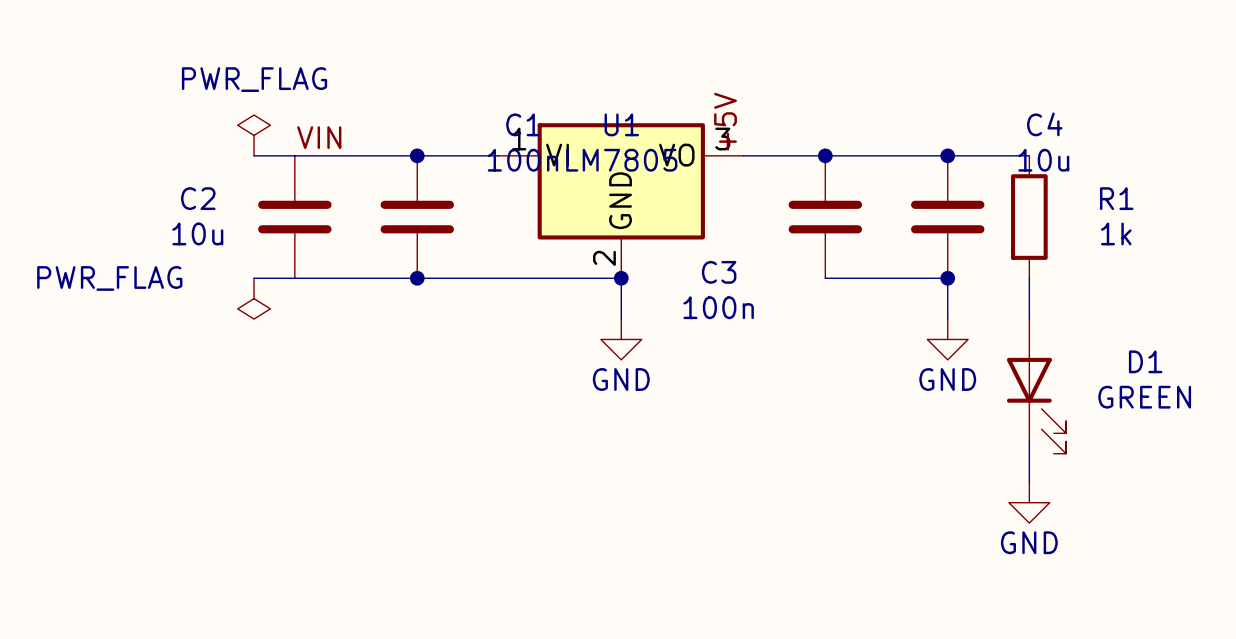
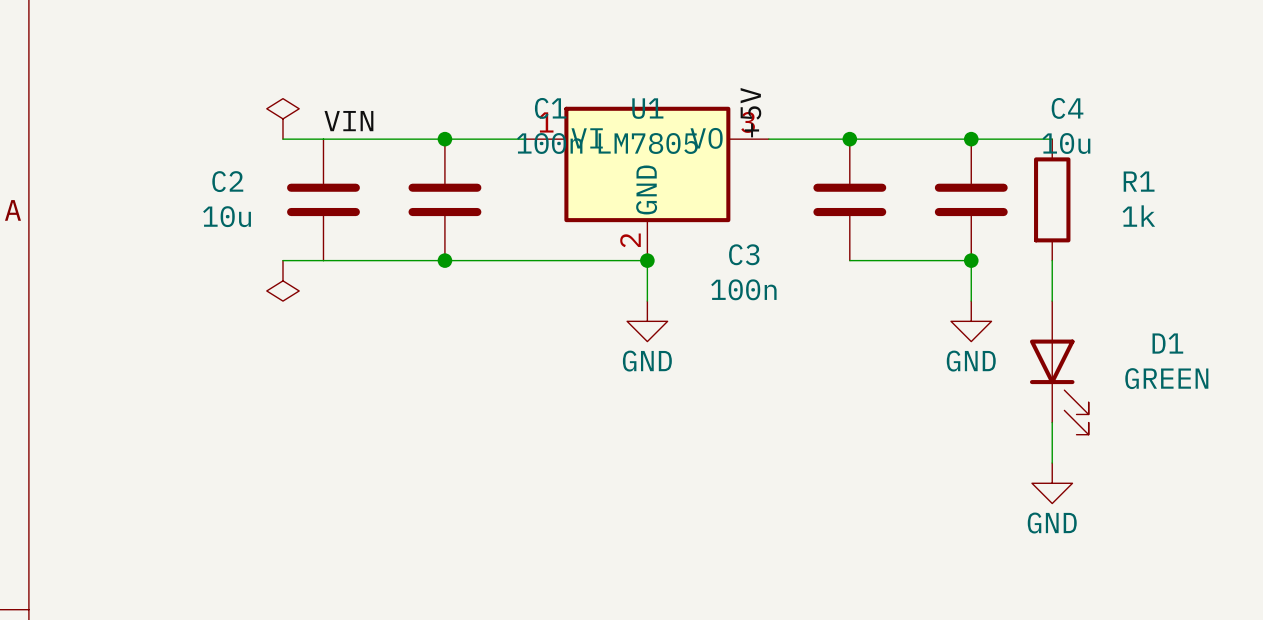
power symbol text: PWR_FLAG (254, 79) -> none
power symbol text: PWR_FLAG (109, 278) -> none

